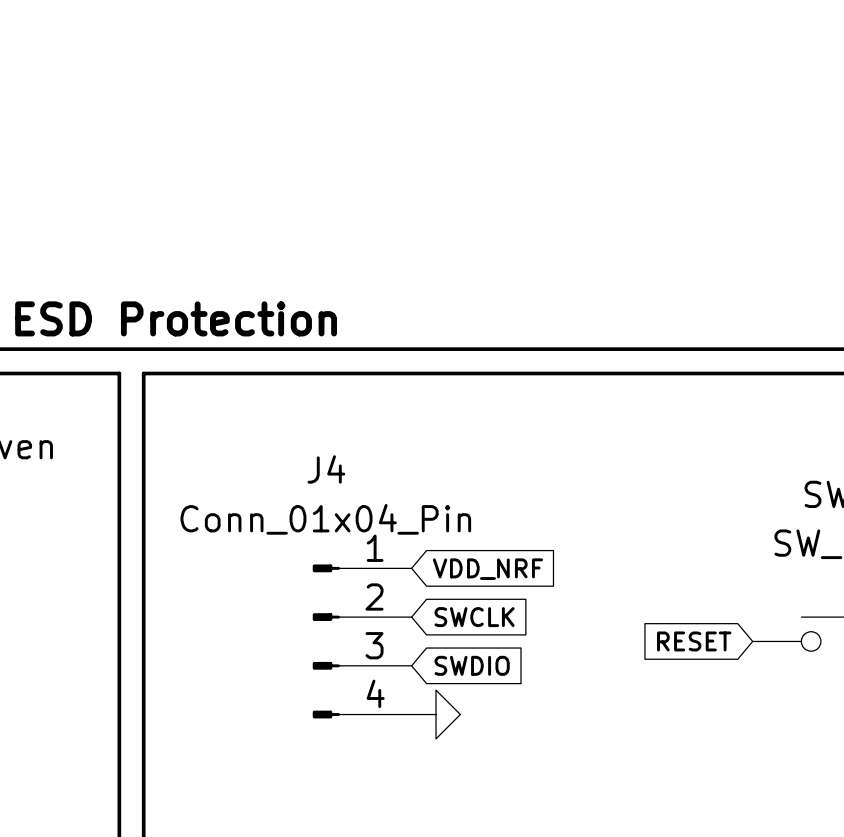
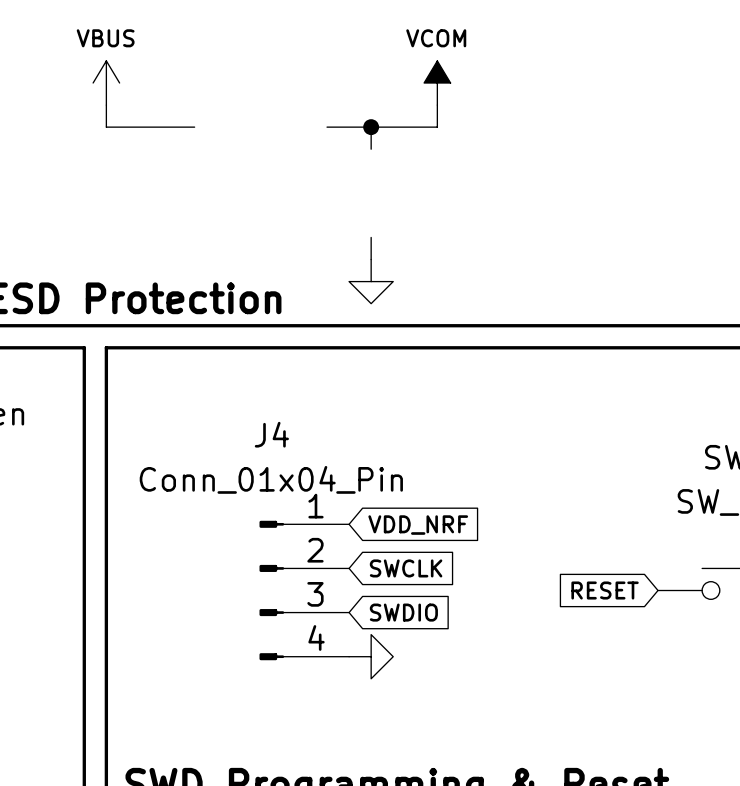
power symbol: none -> VBUS (106, 83)
power symbol: none -> VCOM (437, 83)
wire: none -> (106, 105) (106, 127) (194, 127)
wire: none -> (437, 105) (437, 127) (327, 127)
wire: none -> (371, 127) (371, 149)
junction: none -> (371, 127)
wire: none -> (371, 237) (371, 259)
power symbol: none -> (371, 281)

